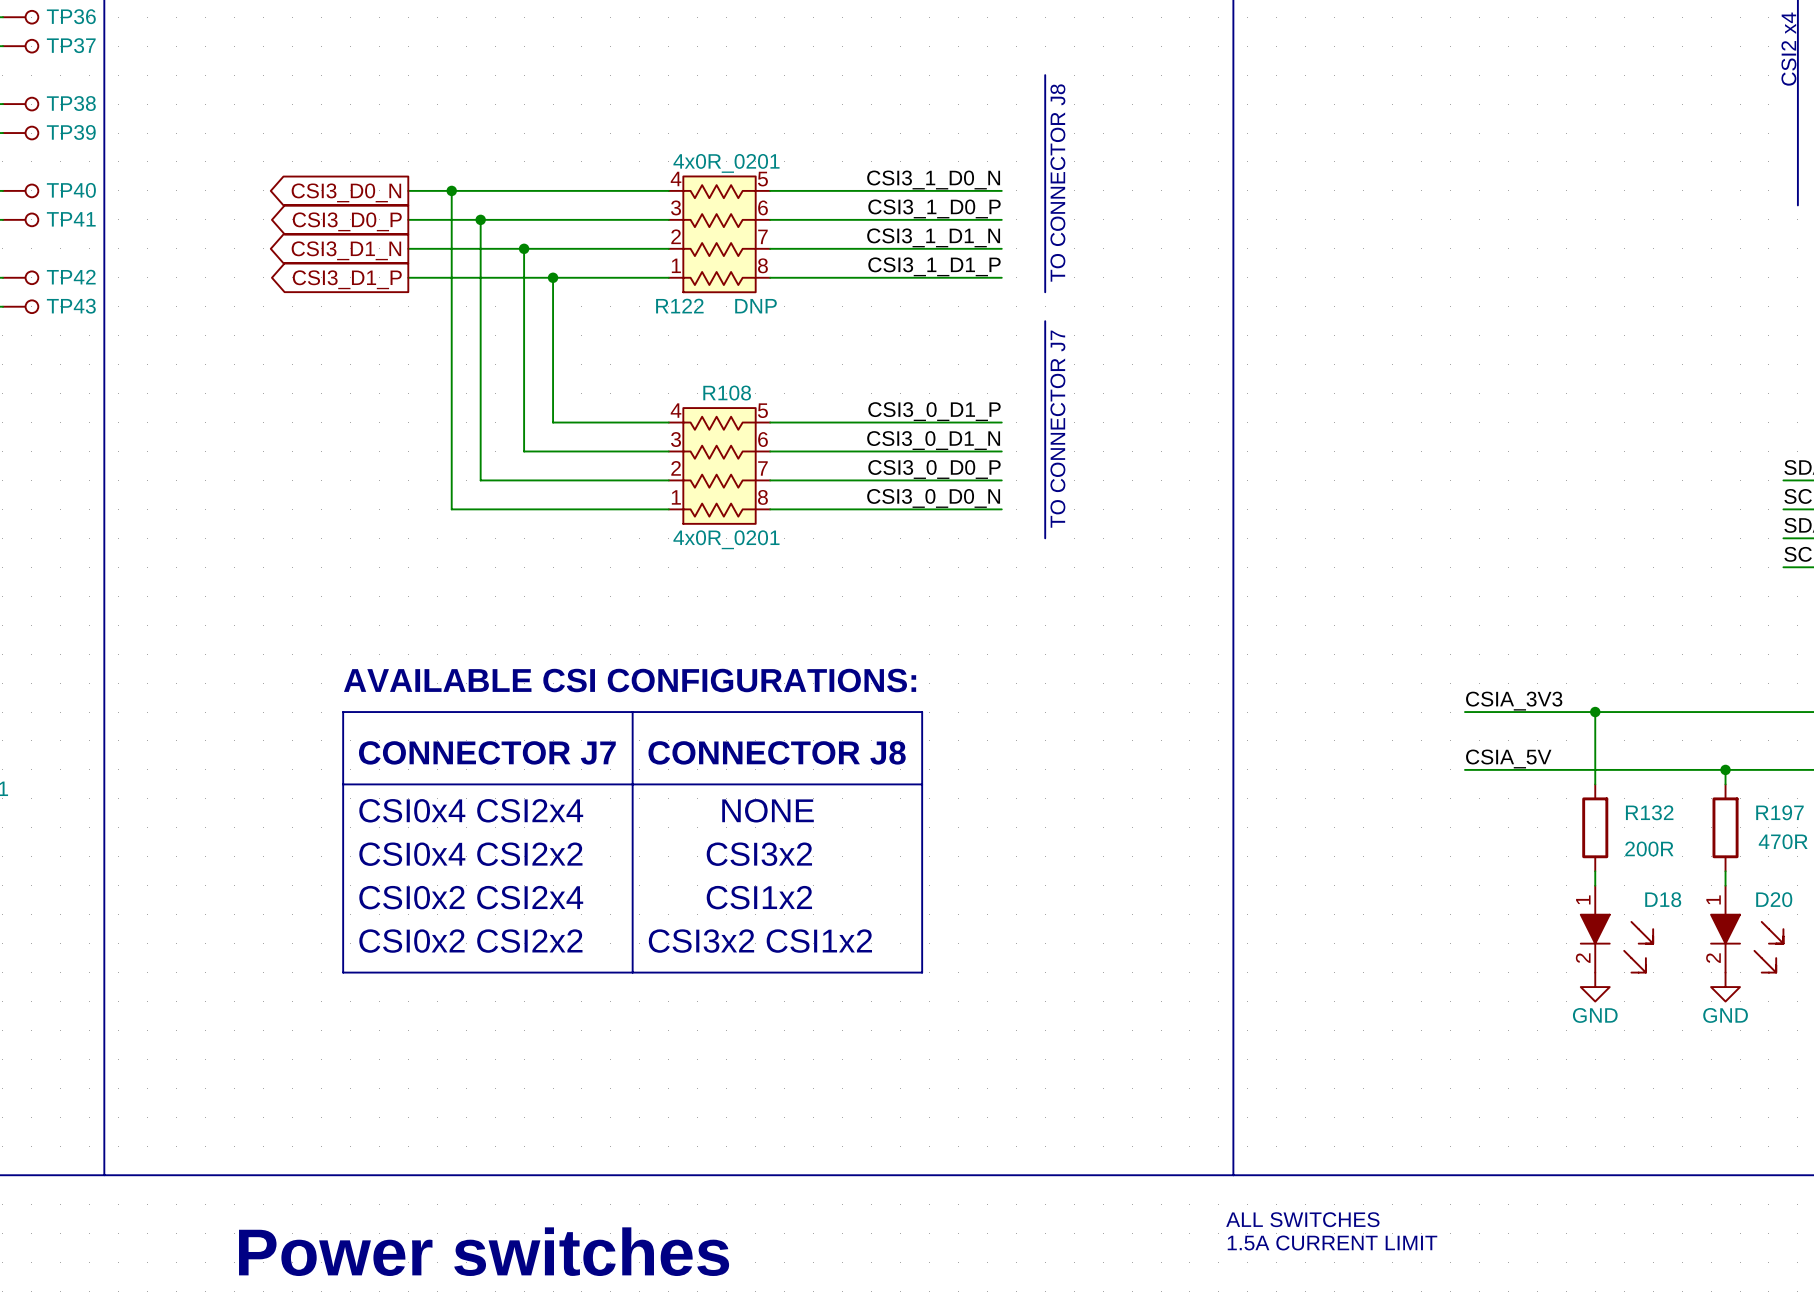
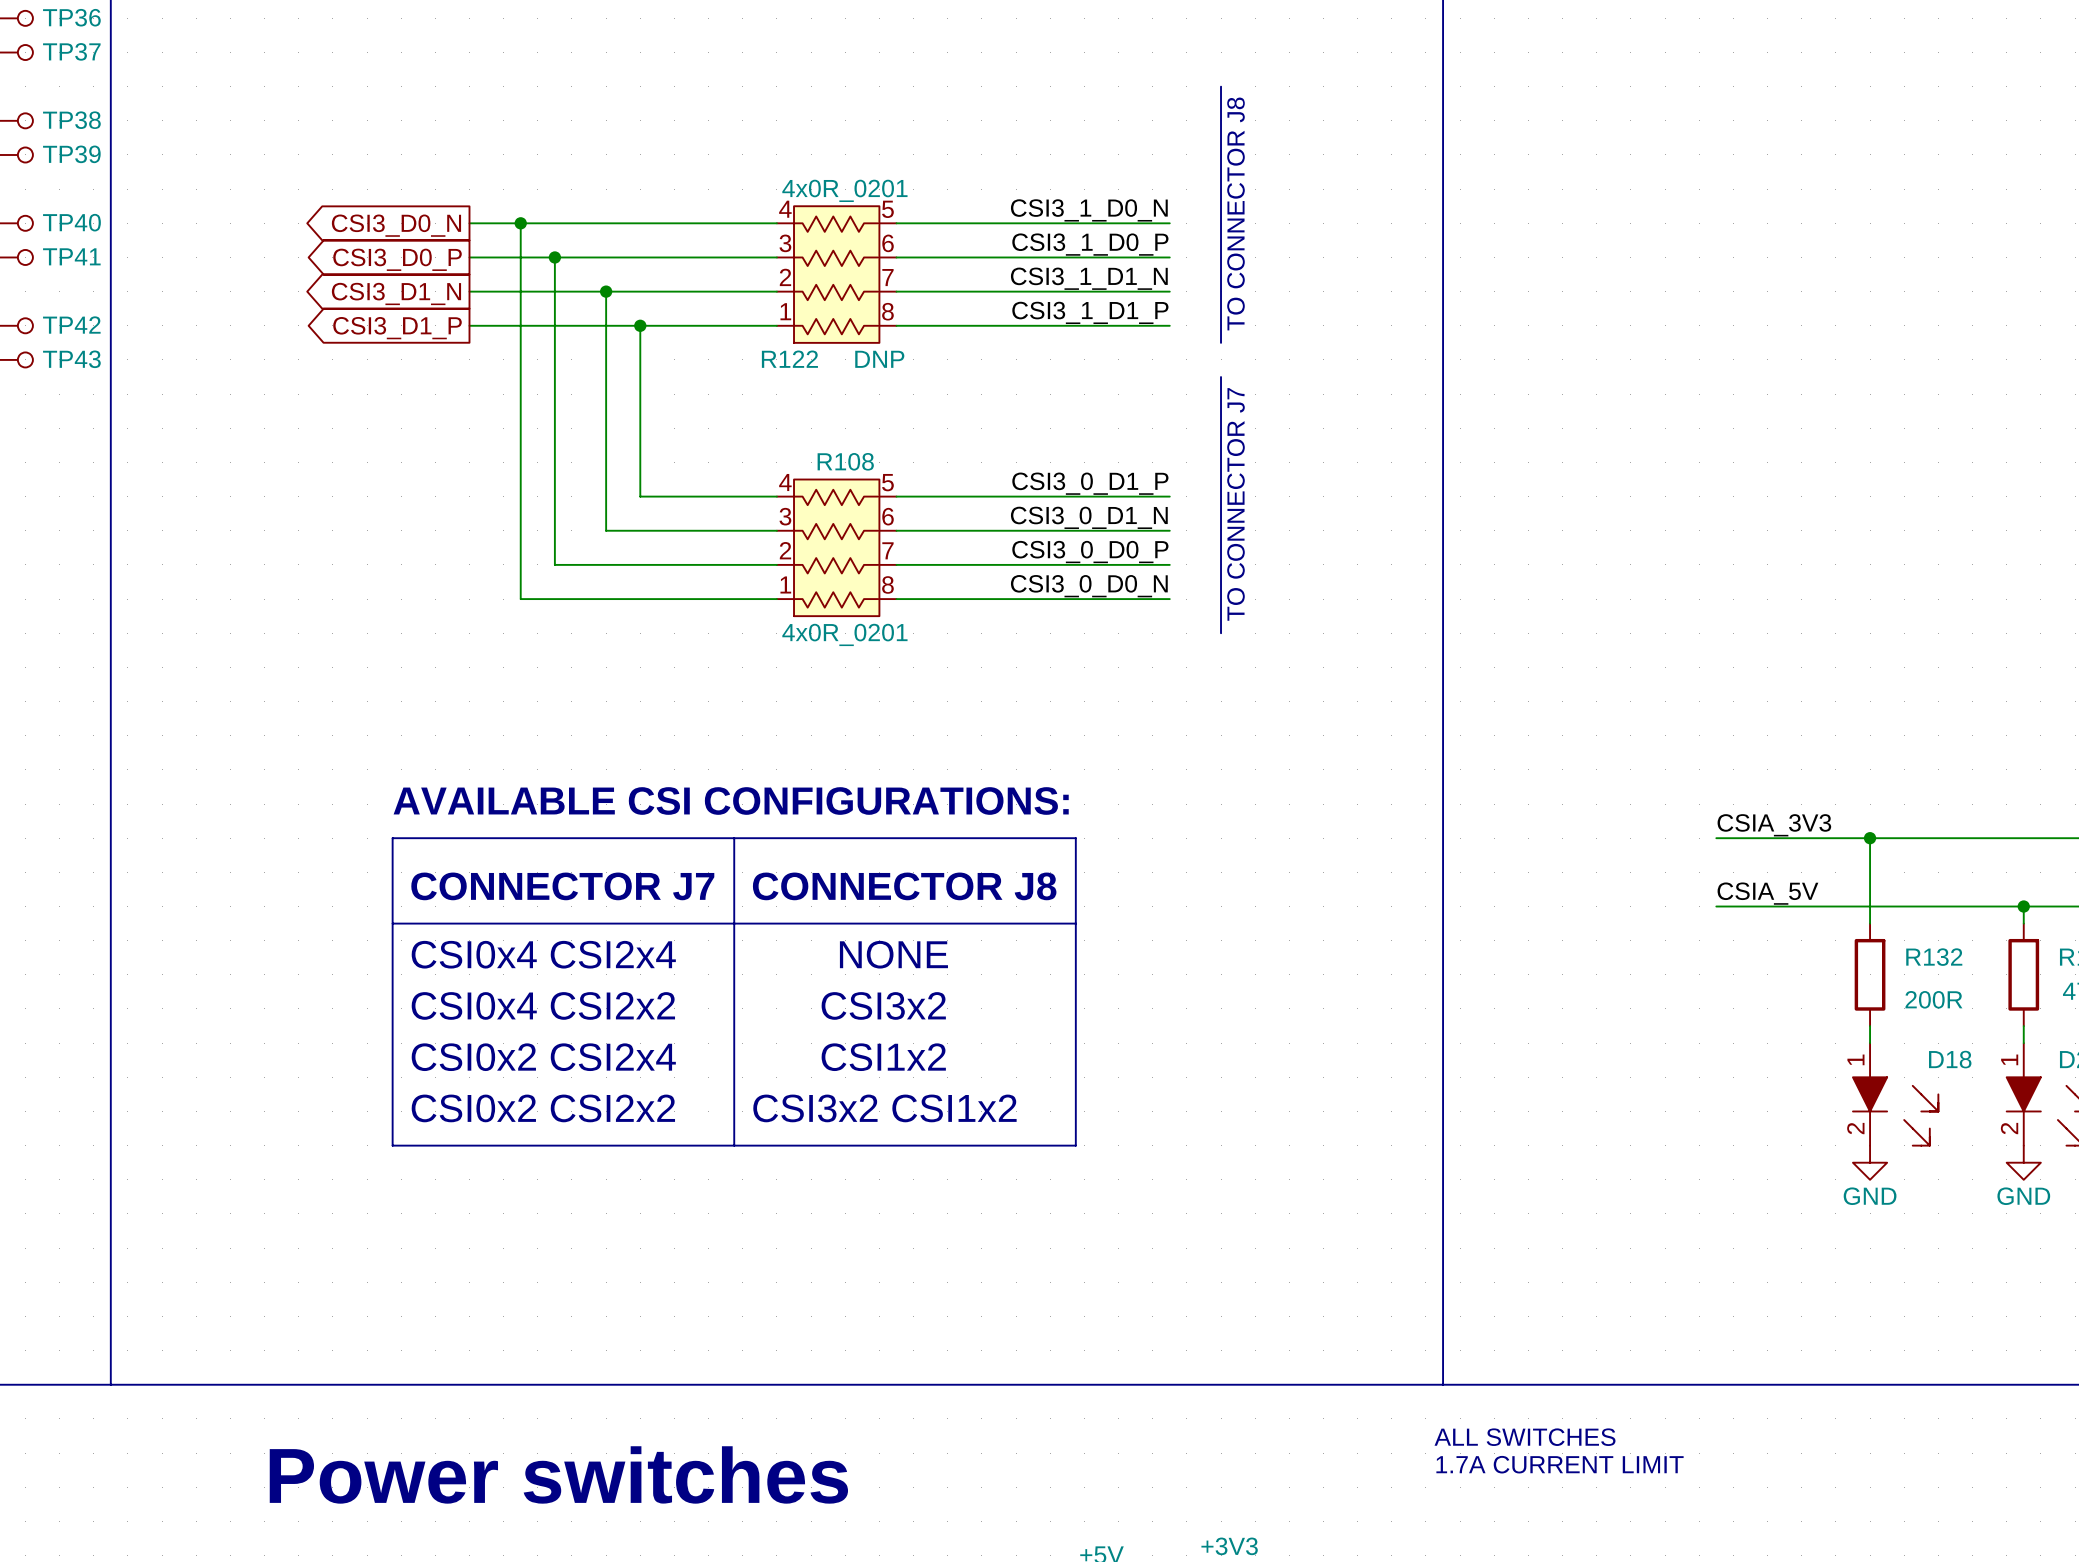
text: 1.5A CURRENT LIMIT (1332, 1242) -> 1.7A CURRENT LIMIT (1560, 1464)

